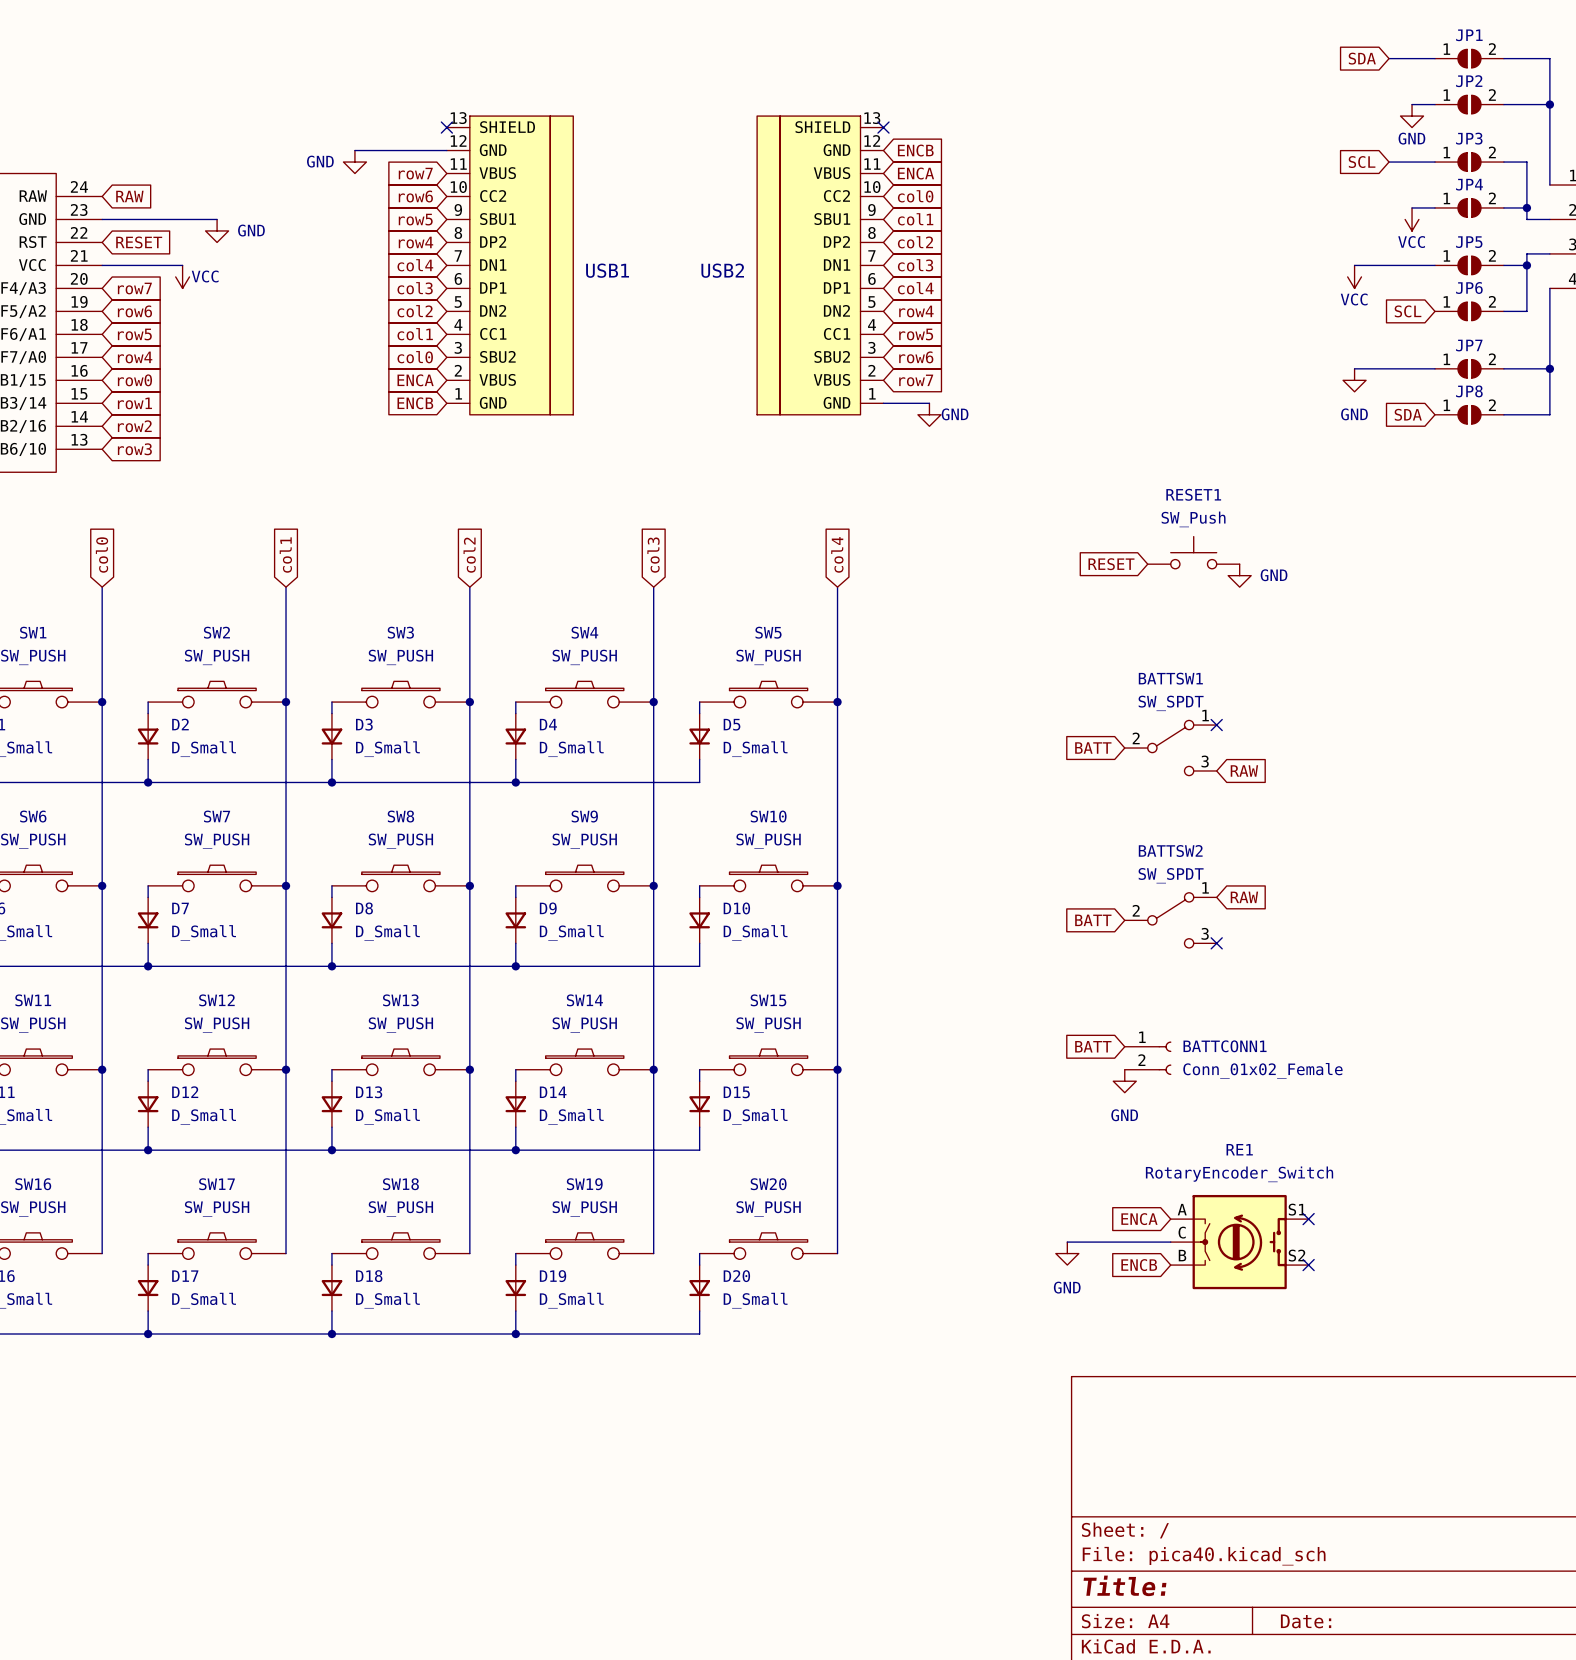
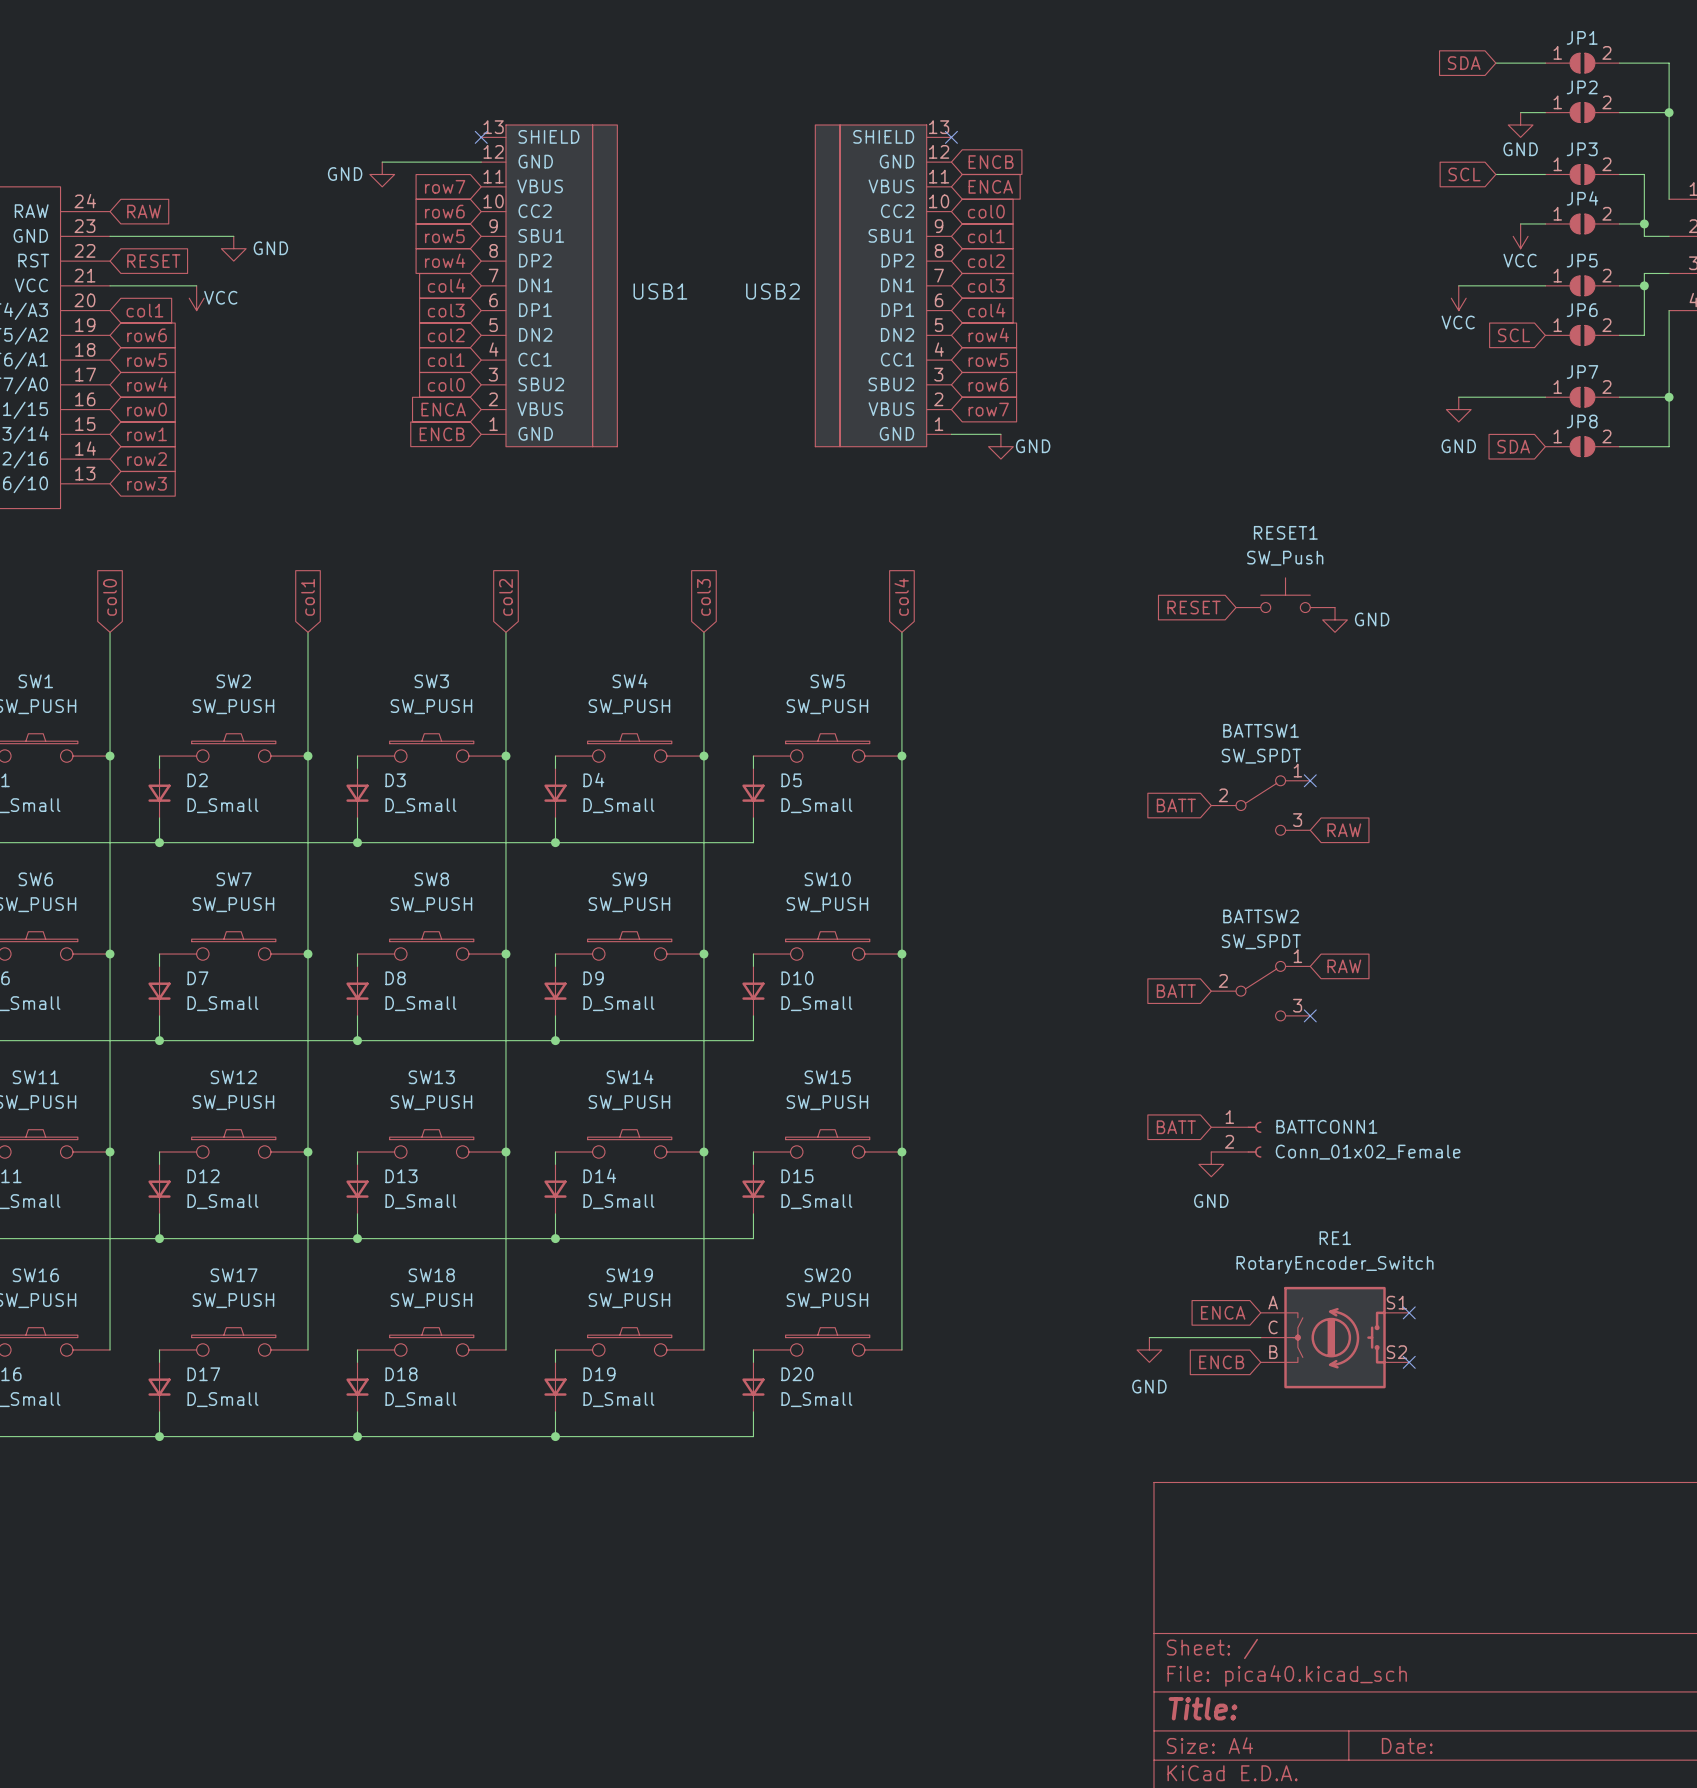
global label: row7 (134, 288) -> col1 (144, 310)

